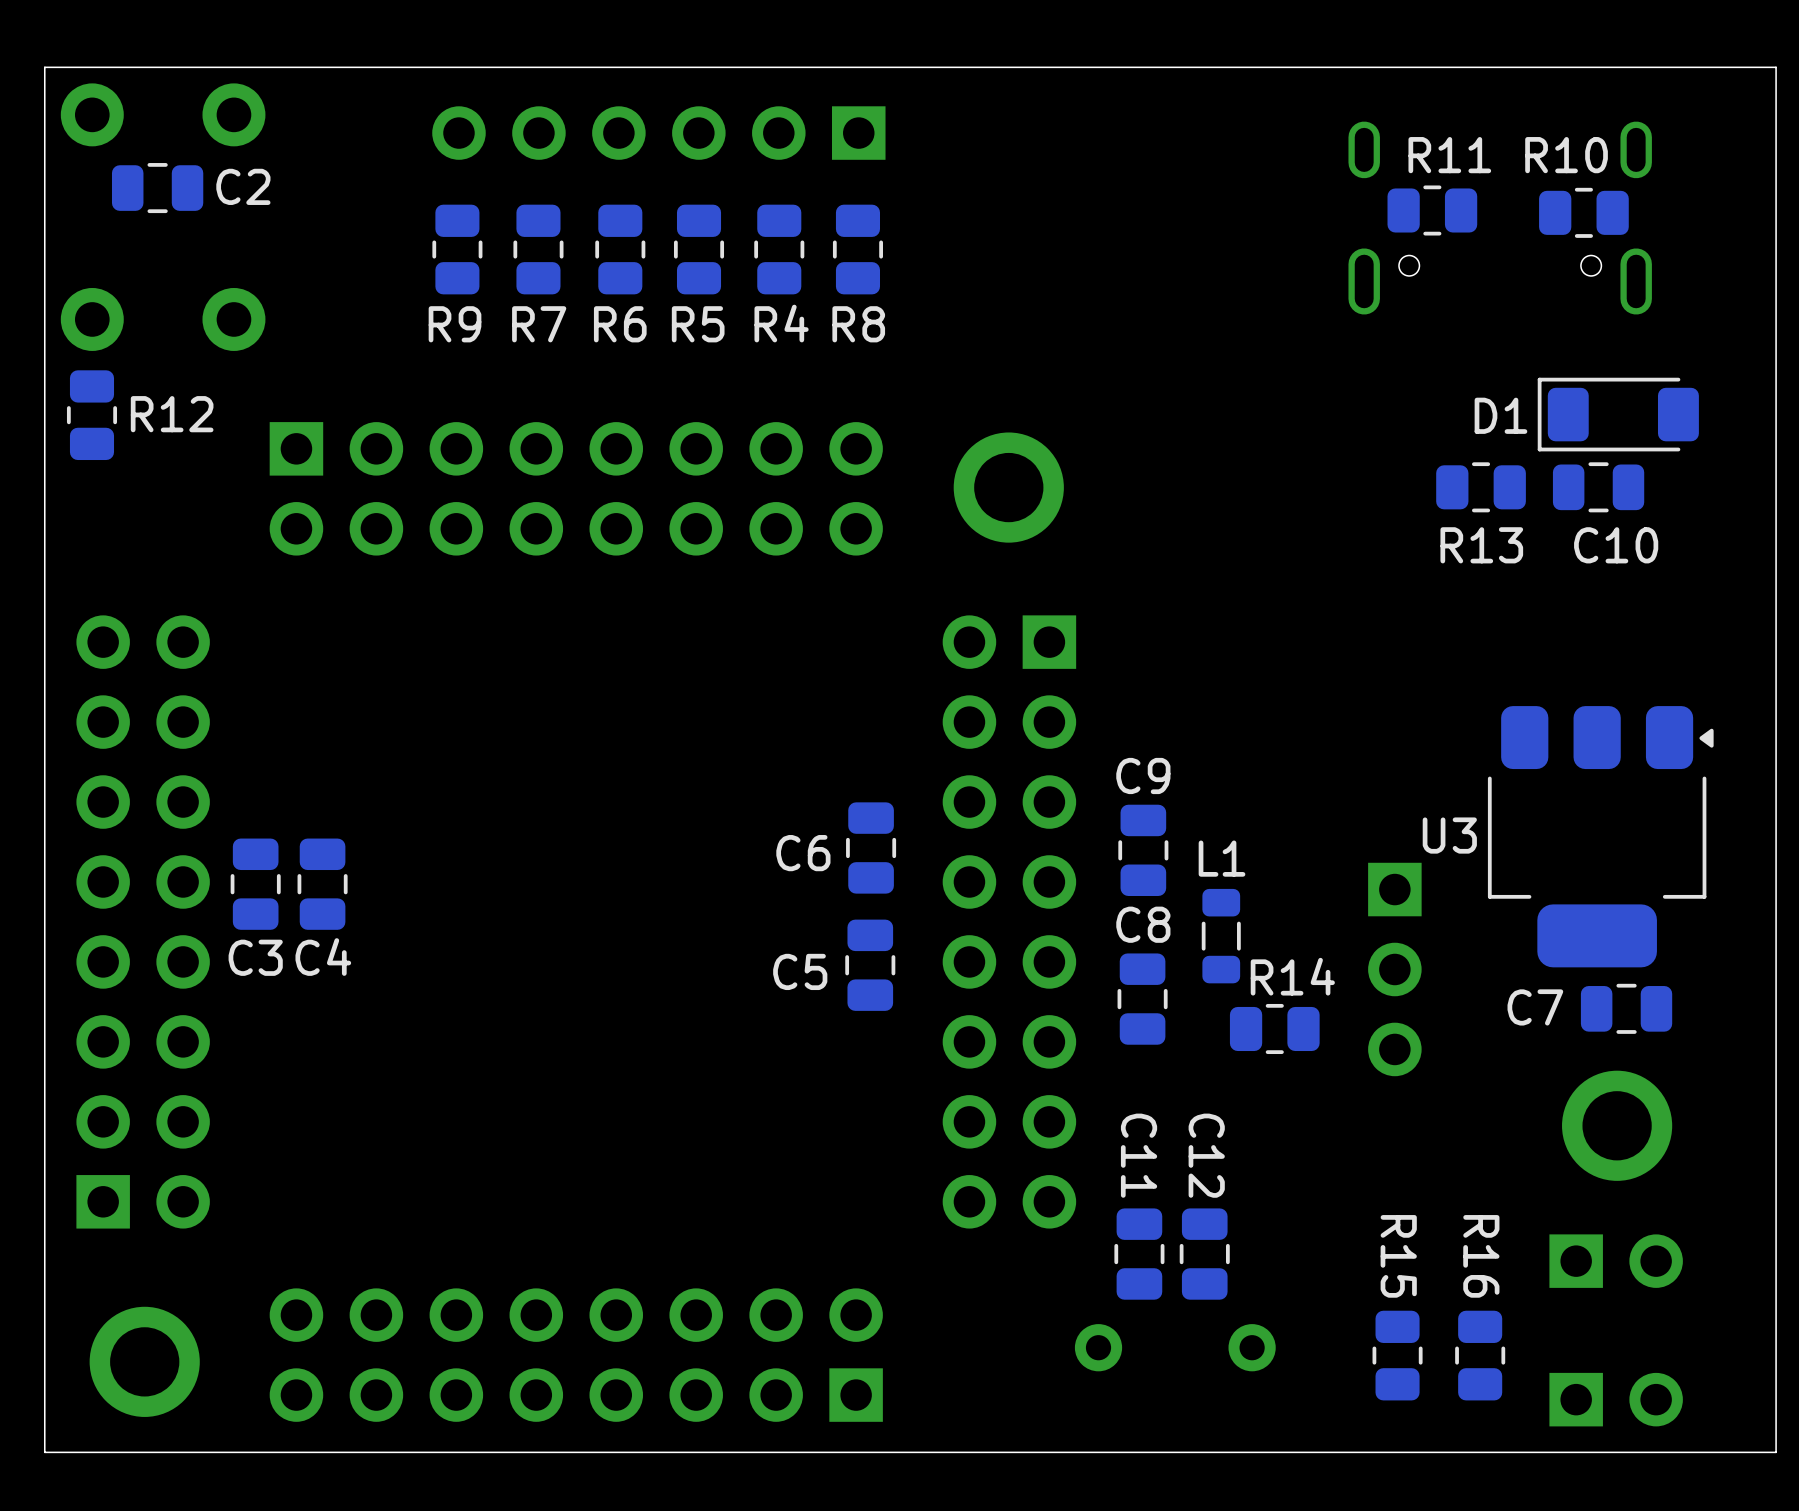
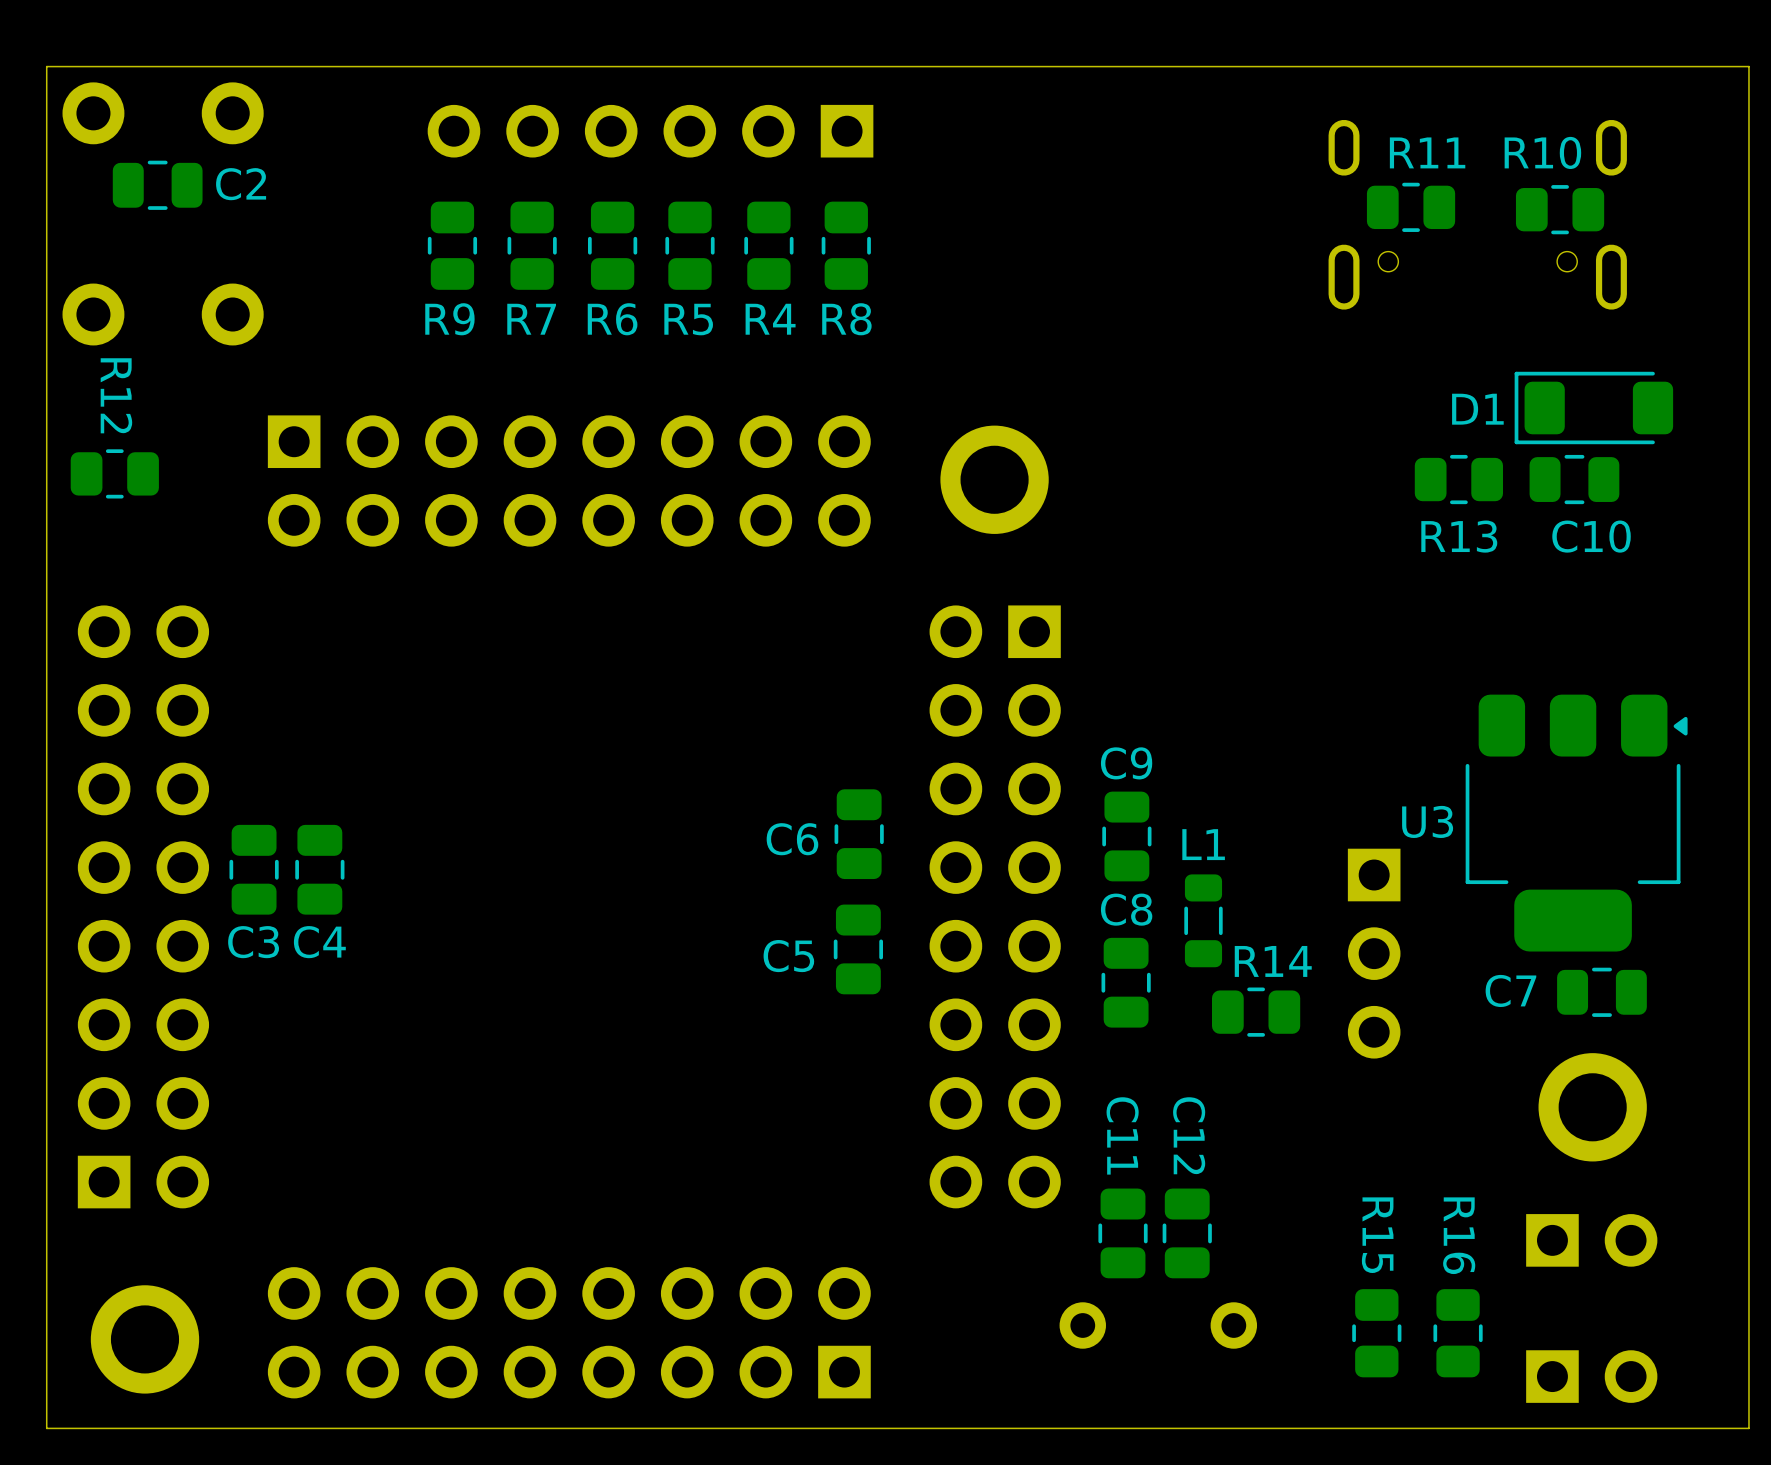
R12 name position: R12 (172, 414) -> R12 (116, 395)
R12 rotation: 0° (91, 415) -> 90° clockwise (114, 473)
R12 position: (91, 415) -> (114, 473)

